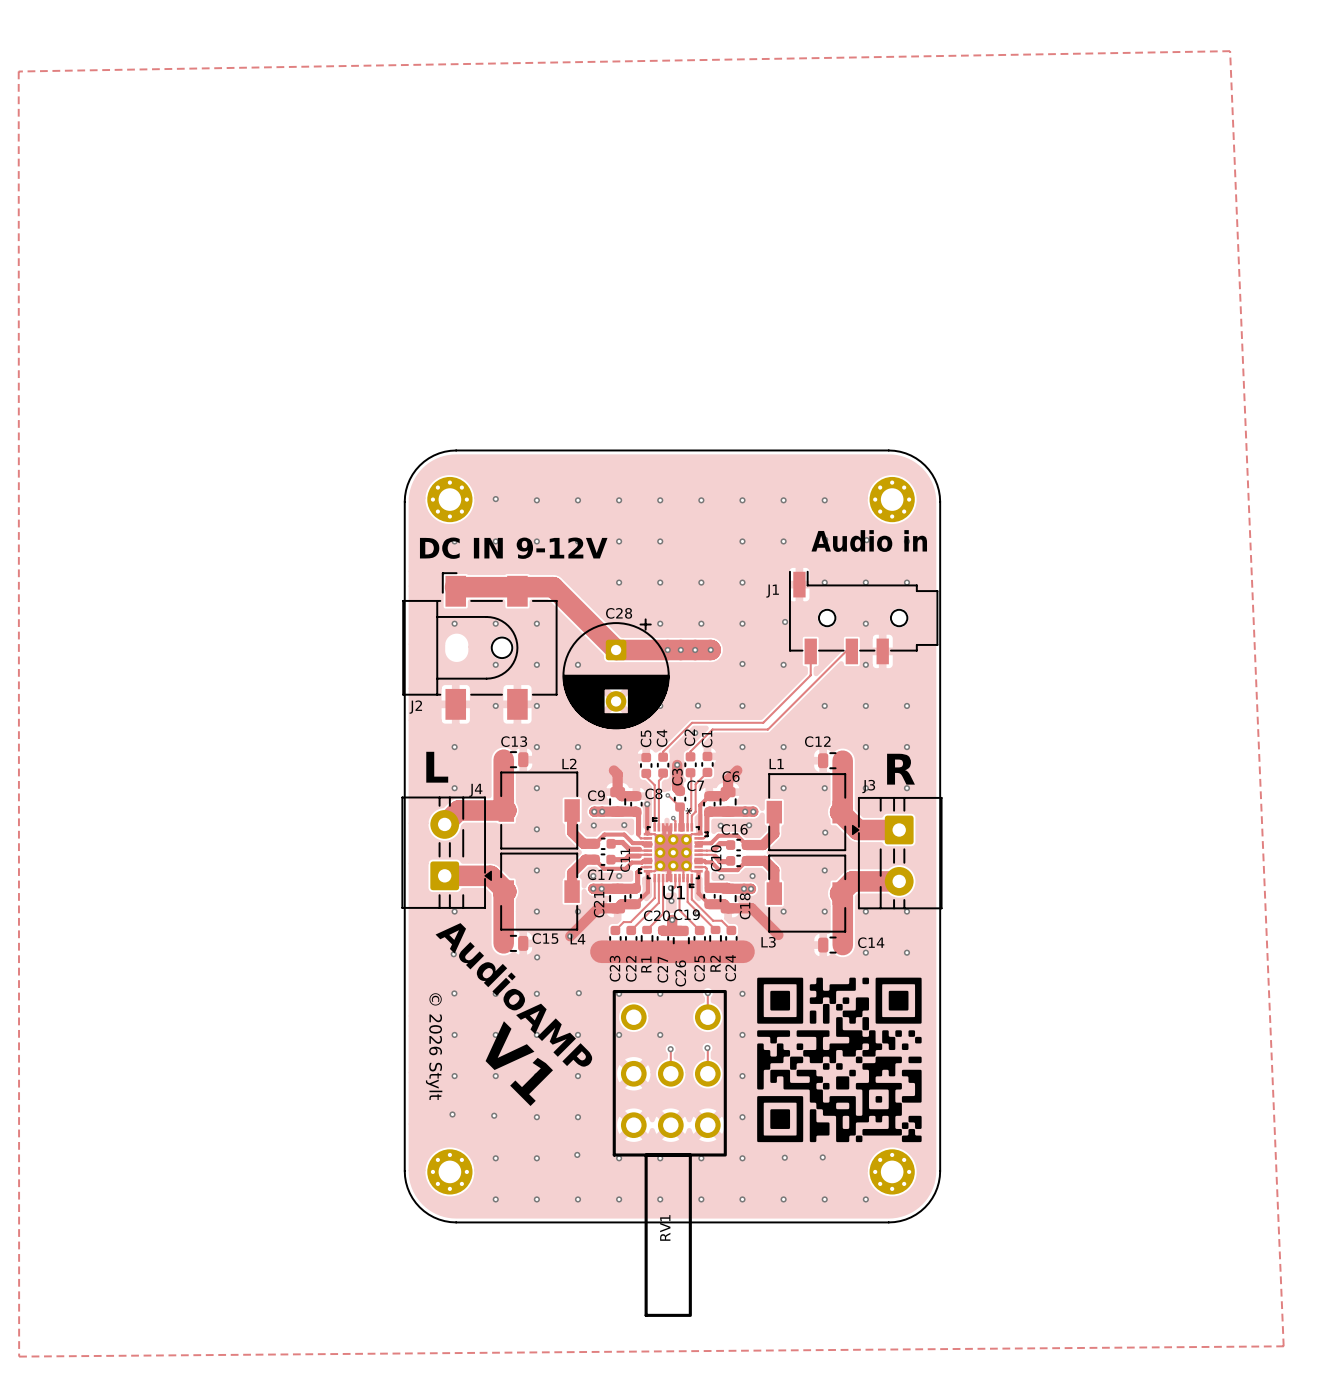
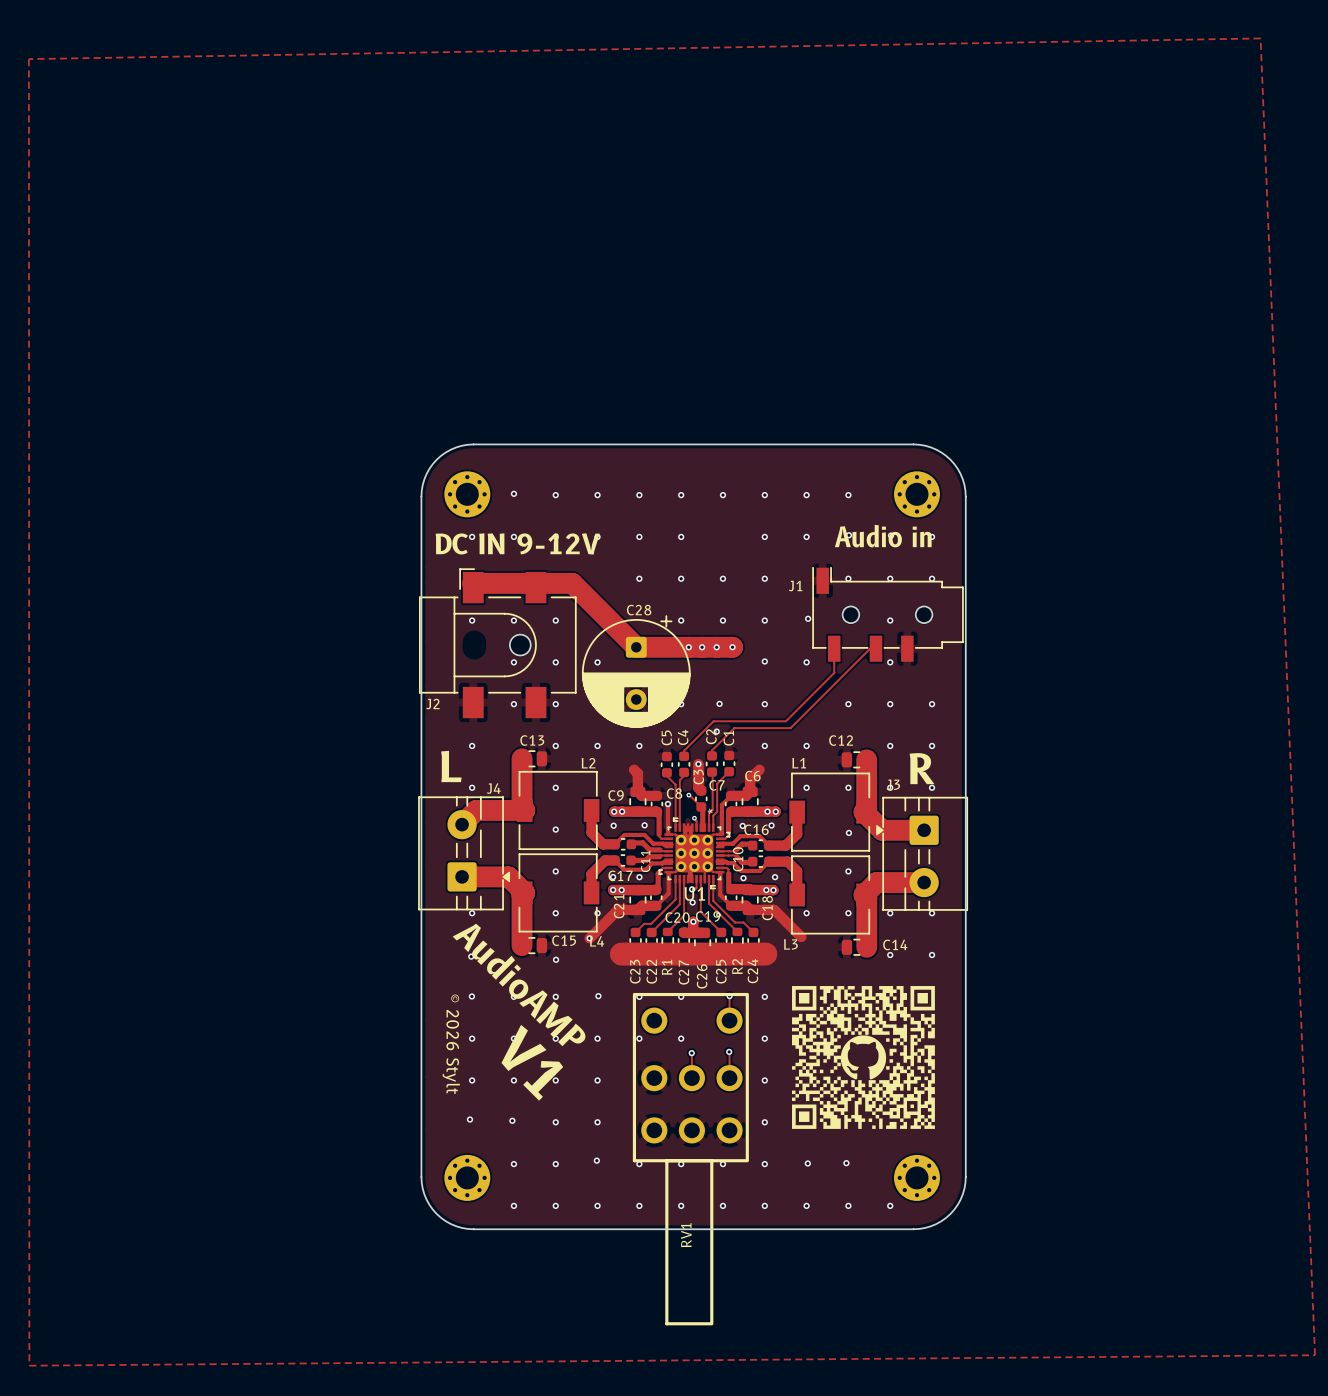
drawing shape: [757, 977, 922, 1143] -> [792, 986, 935, 1129]

